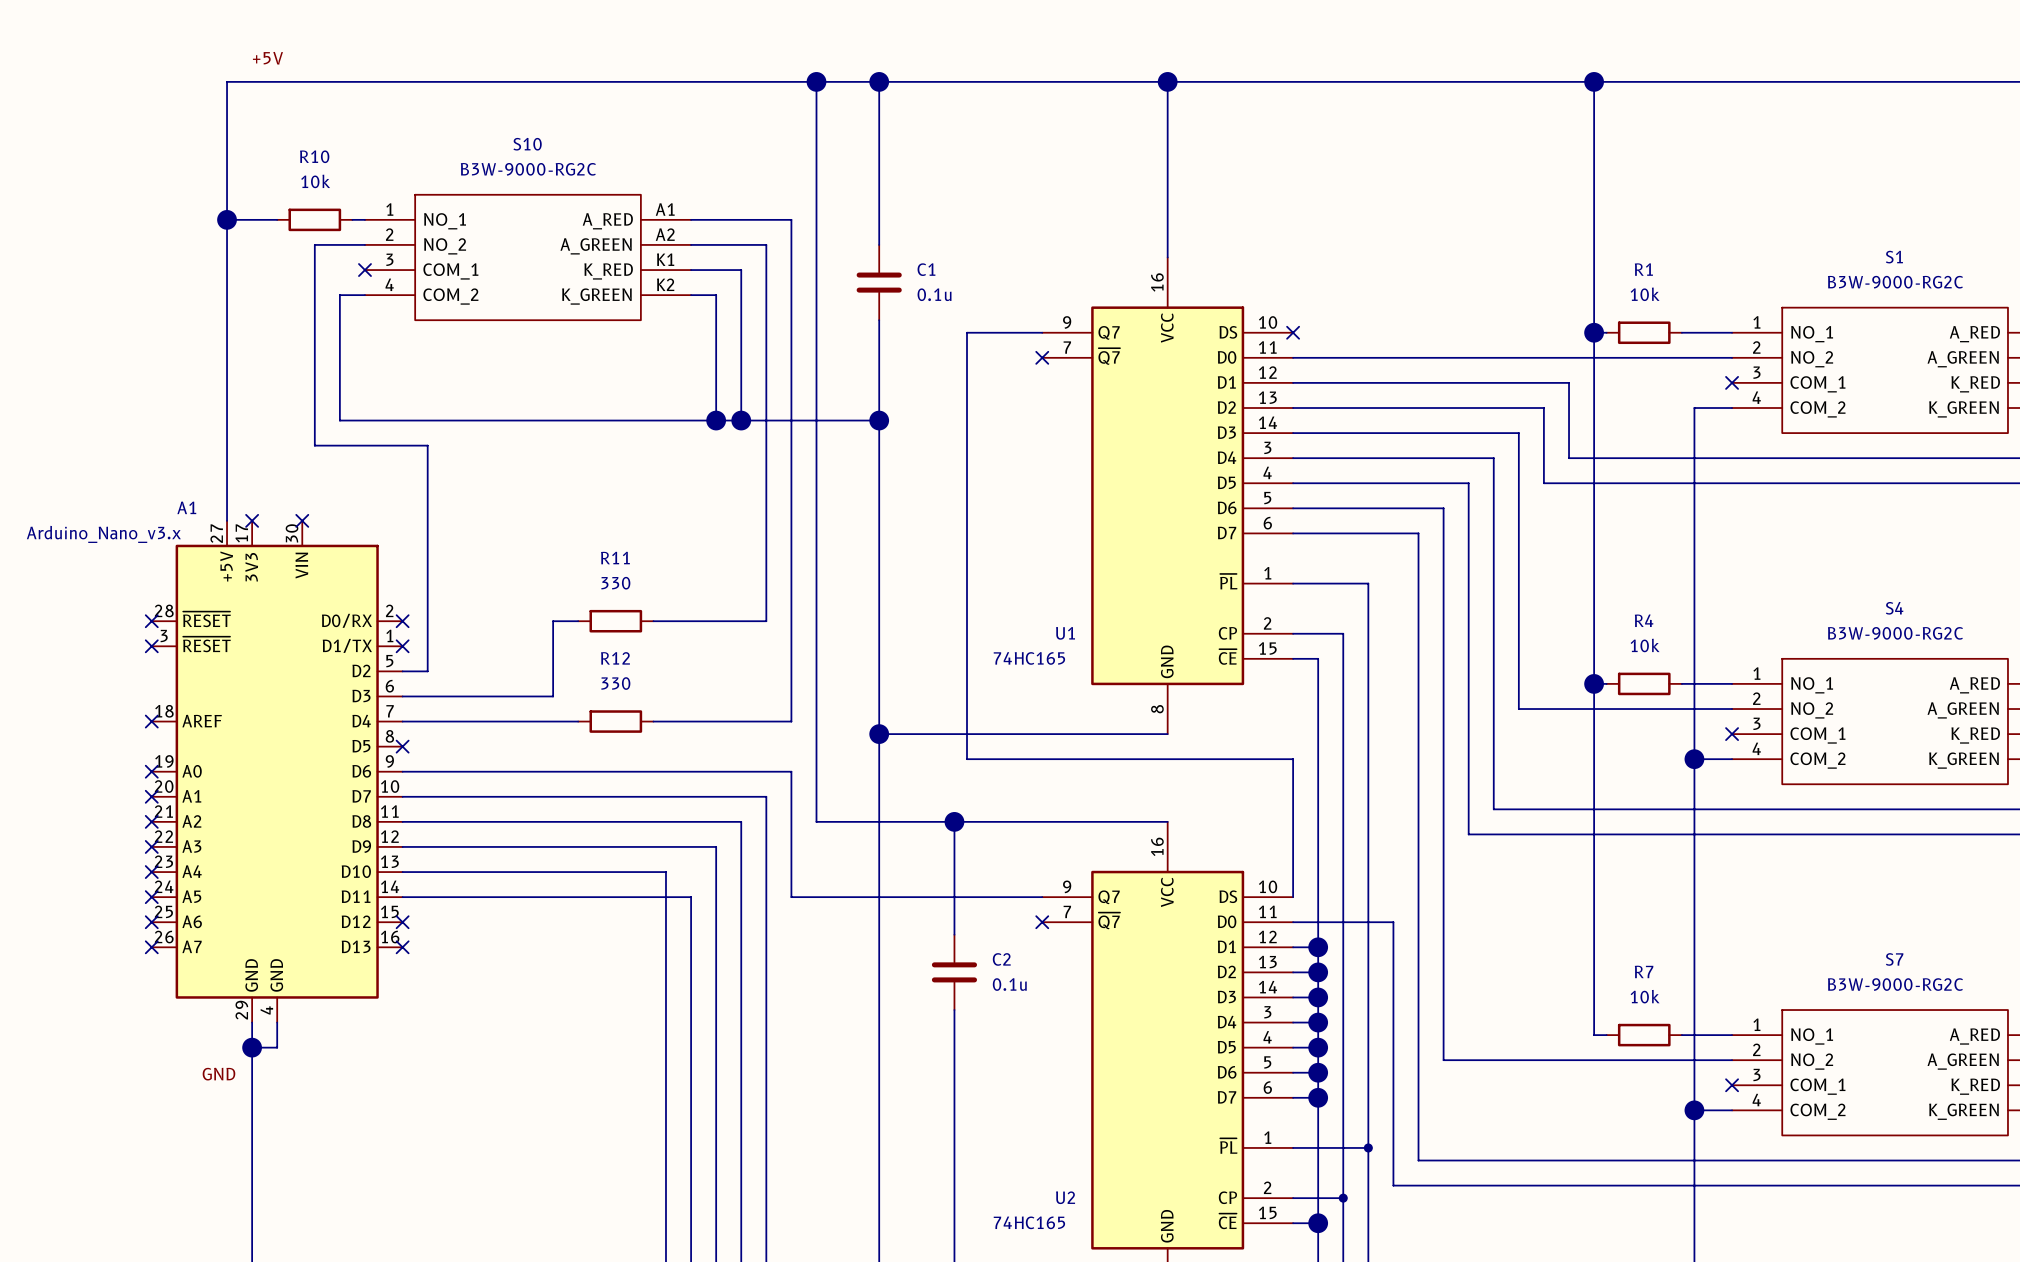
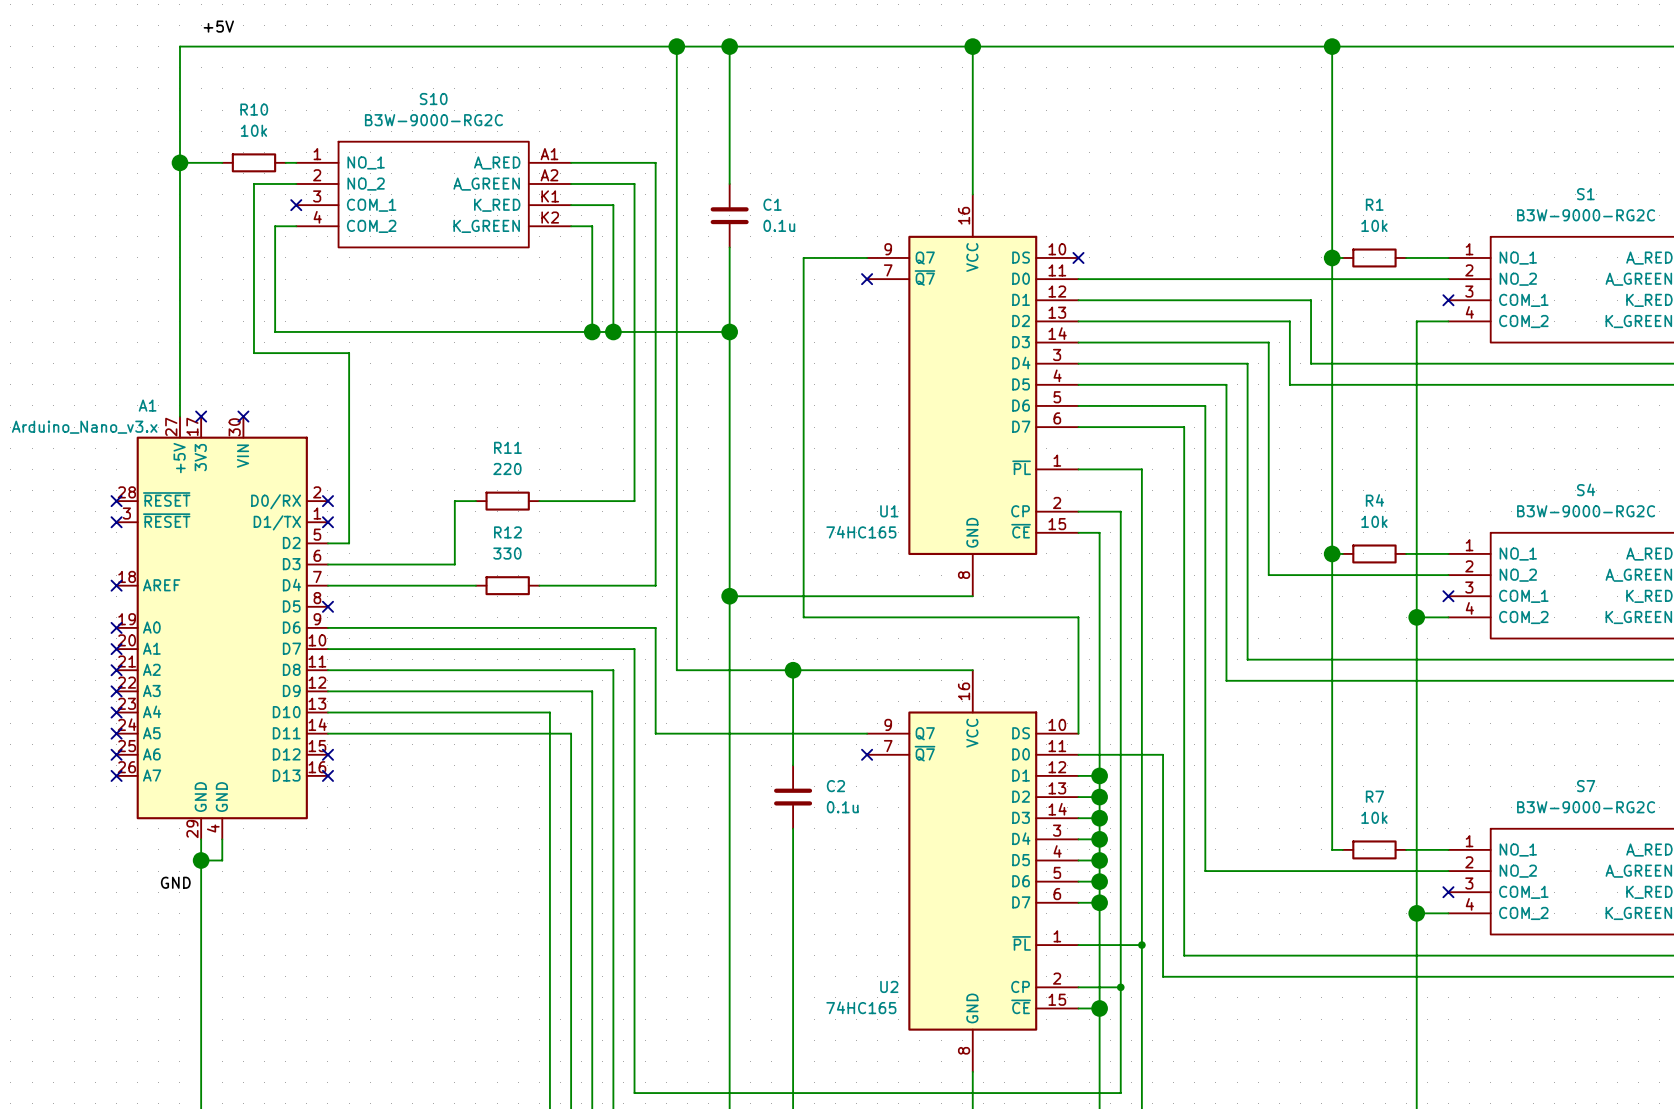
R11 value: 330 (615, 583) -> 220 (507, 469)

